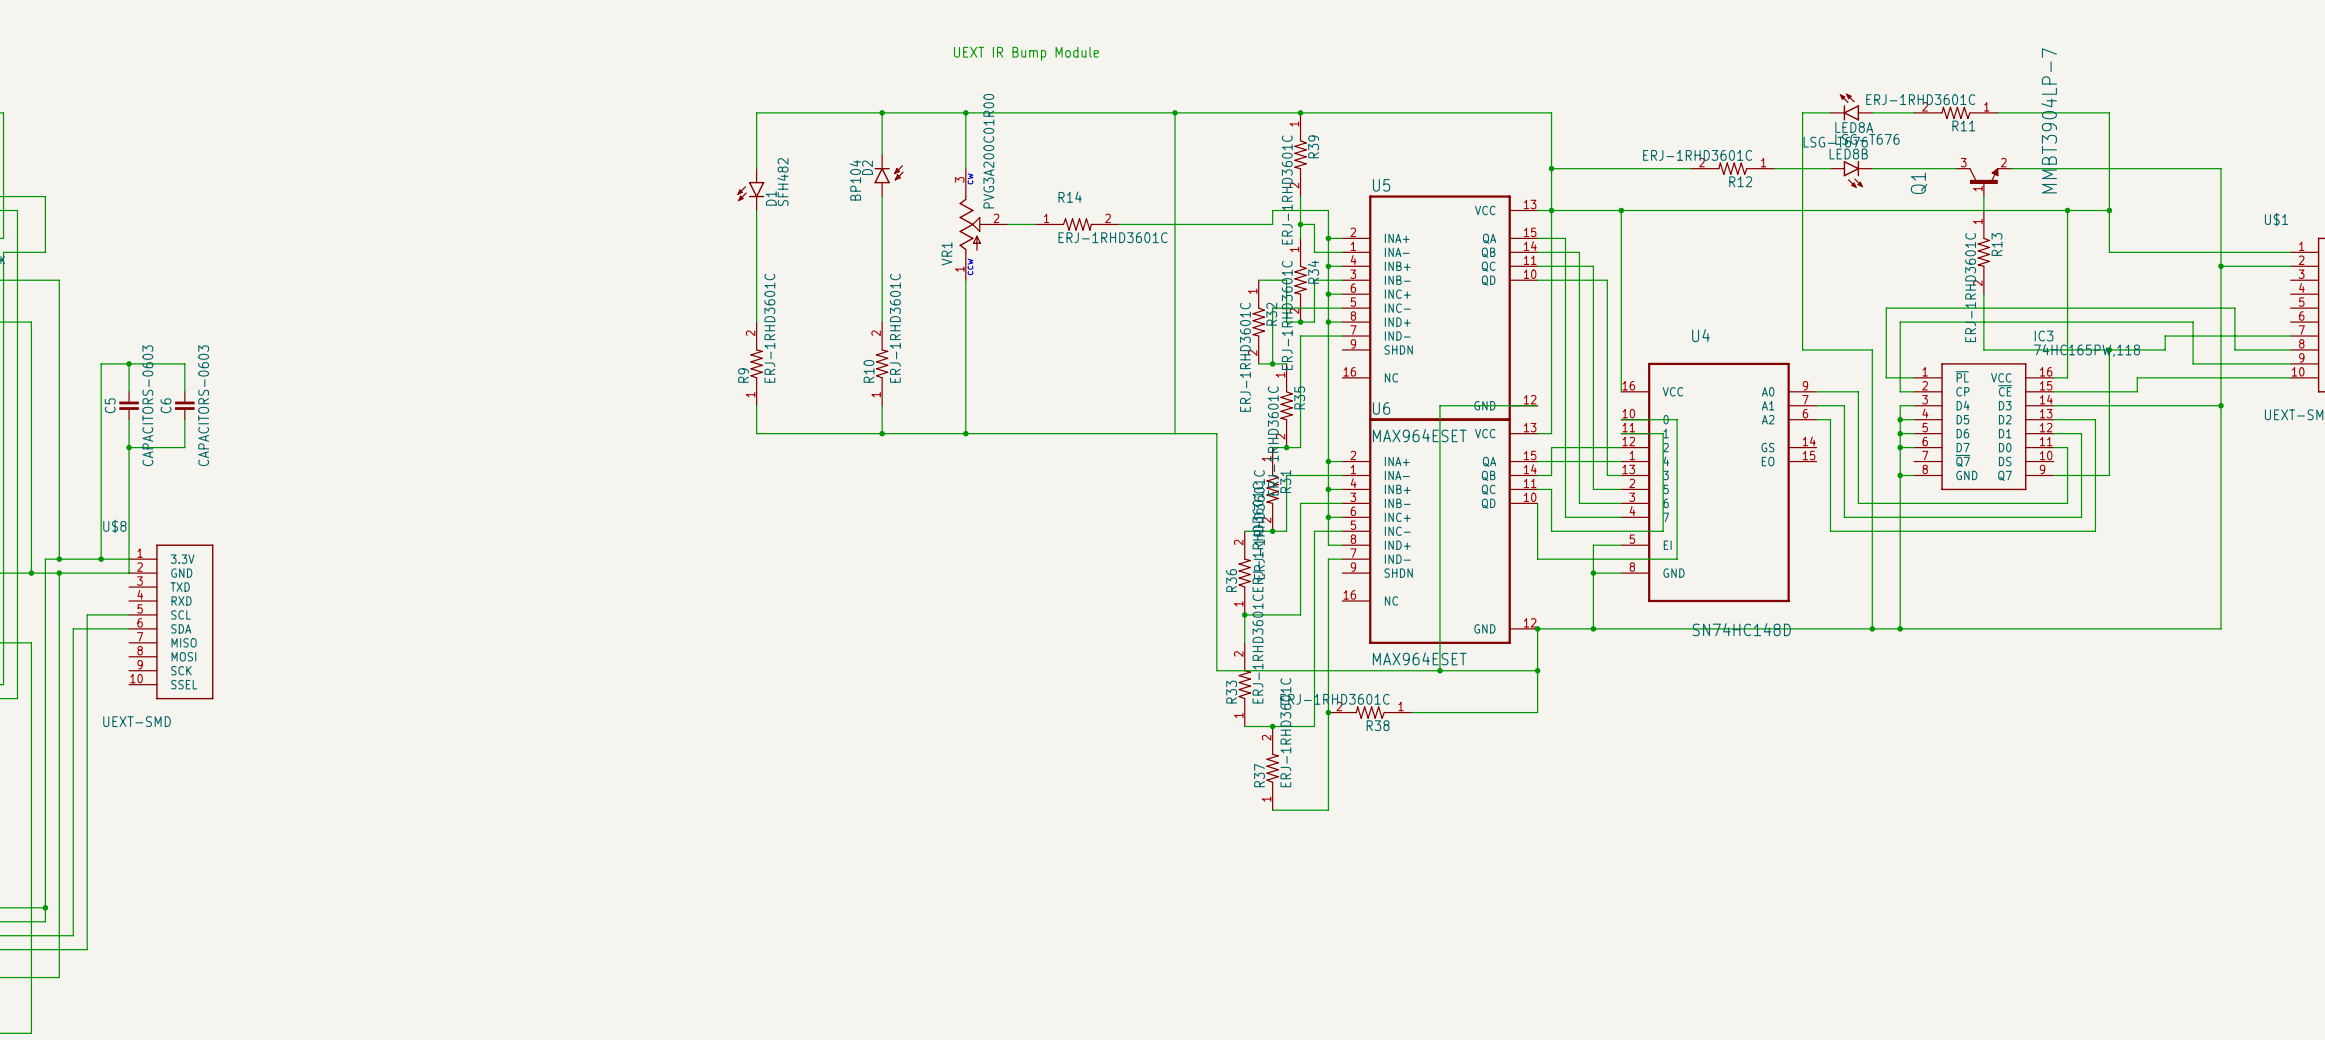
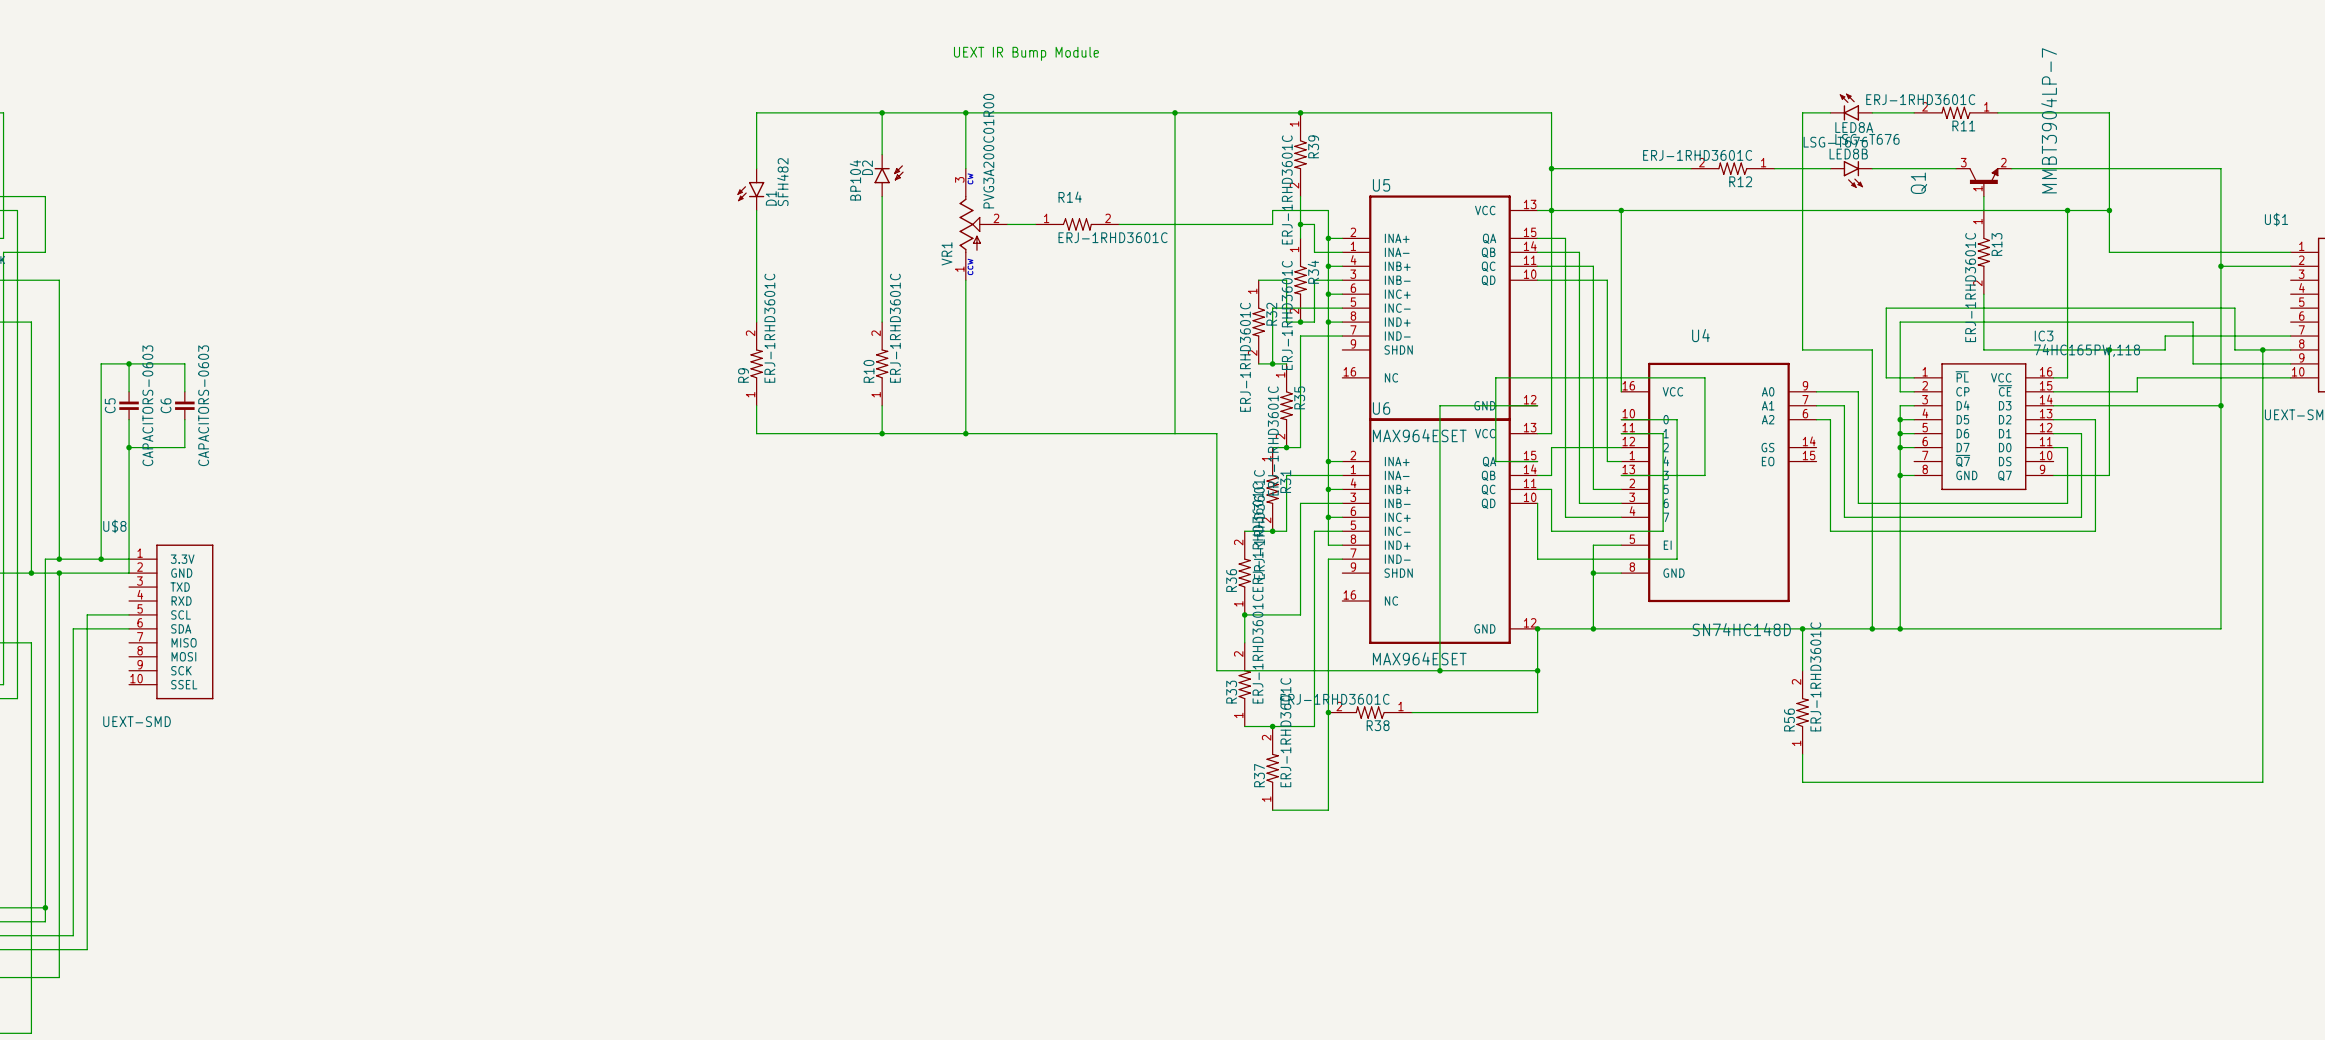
wire: none -> (2262, 349) (2262, 782) (1802, 782) (1802, 754)
junction: none -> (2262, 349)
wire: (1537, 461) (1607, 461) (1607, 475) (1621, 475) -> (1537, 461) (1495, 461) (1495, 377) (1704, 377) (1704, 475) (1621, 475)
wire: none -> (1802, 628) (1802, 670)
junction: none -> (1802, 628)
R56: none -> ERJ-1RHD3601C (1802, 712)

